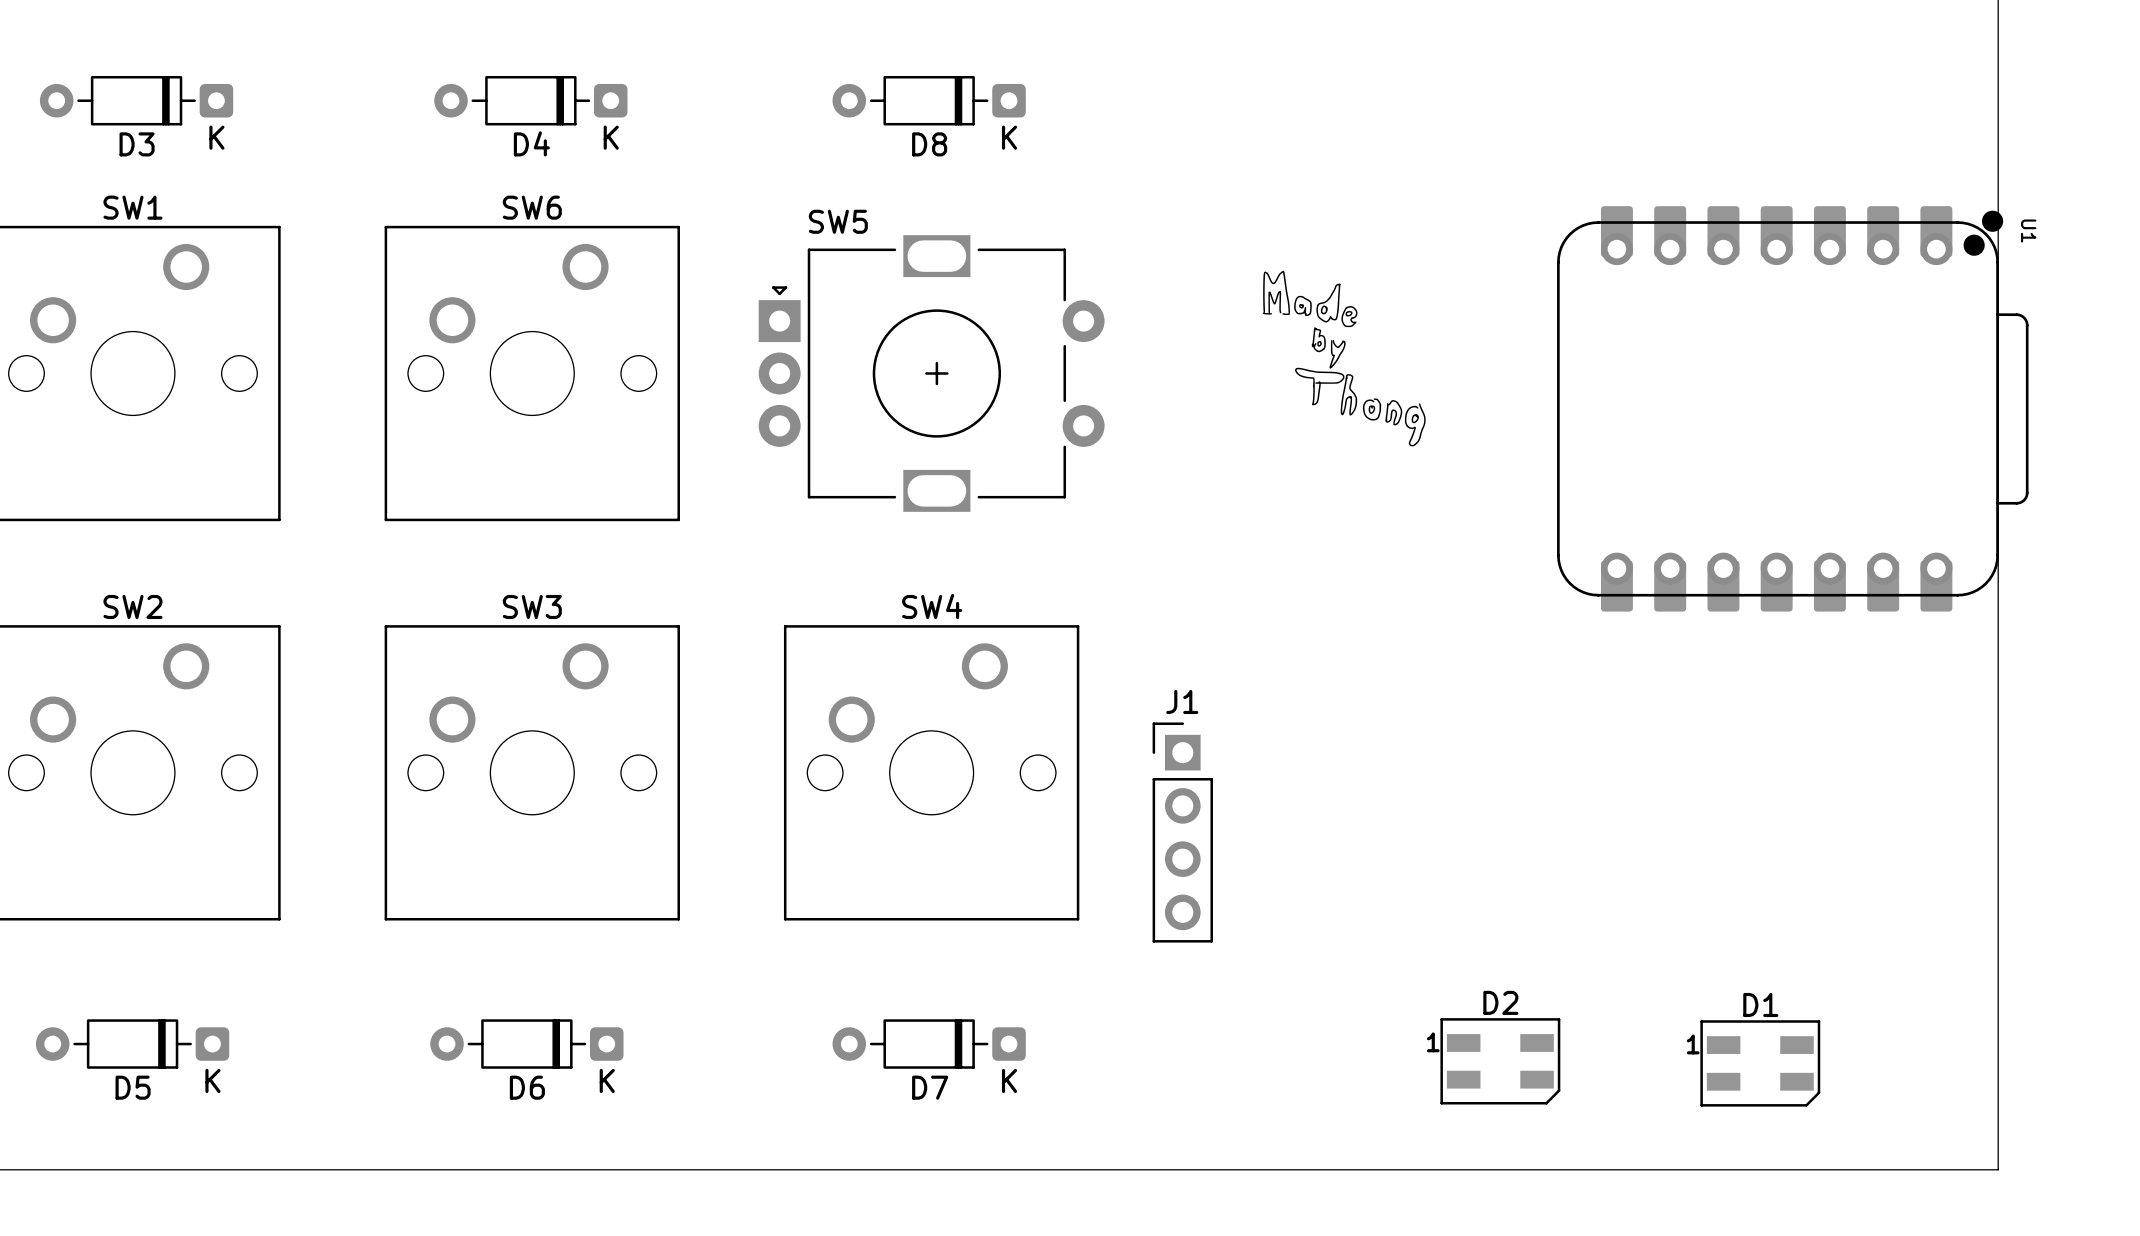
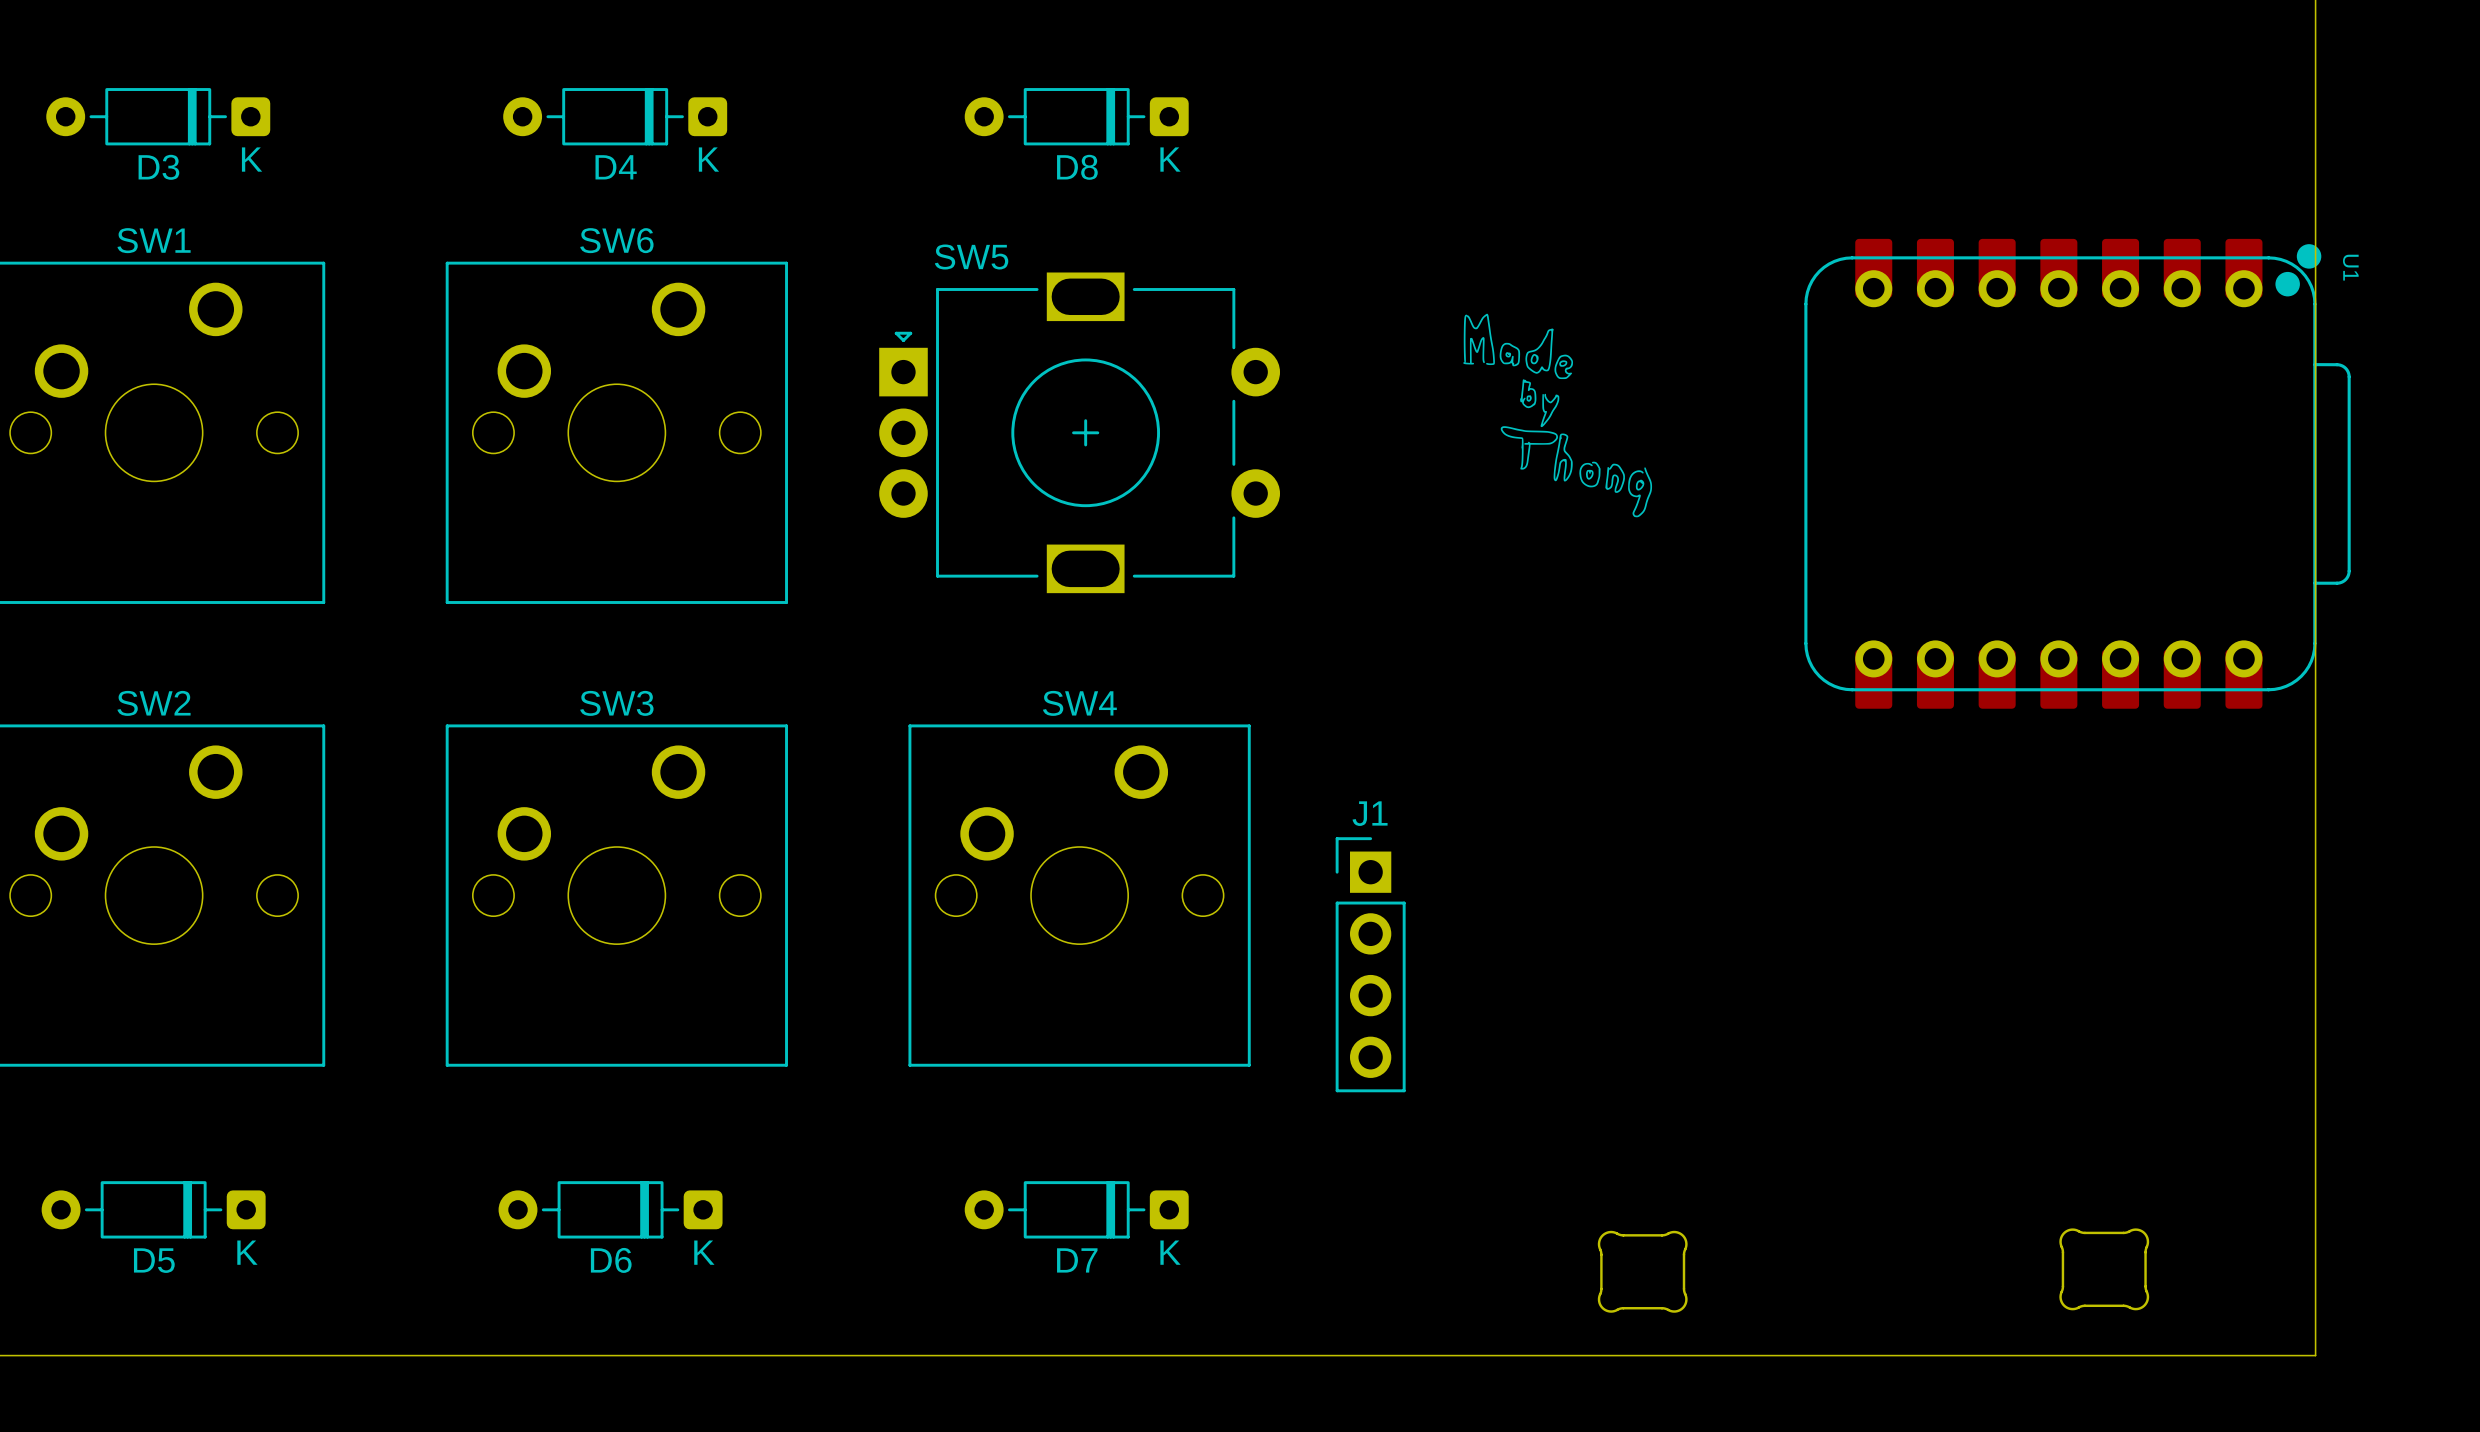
D2: (1500, 1061) -> none
D1: (1760, 1063) -> none
part: none -> (2104, 1269)
part: none -> (1642, 1271)

